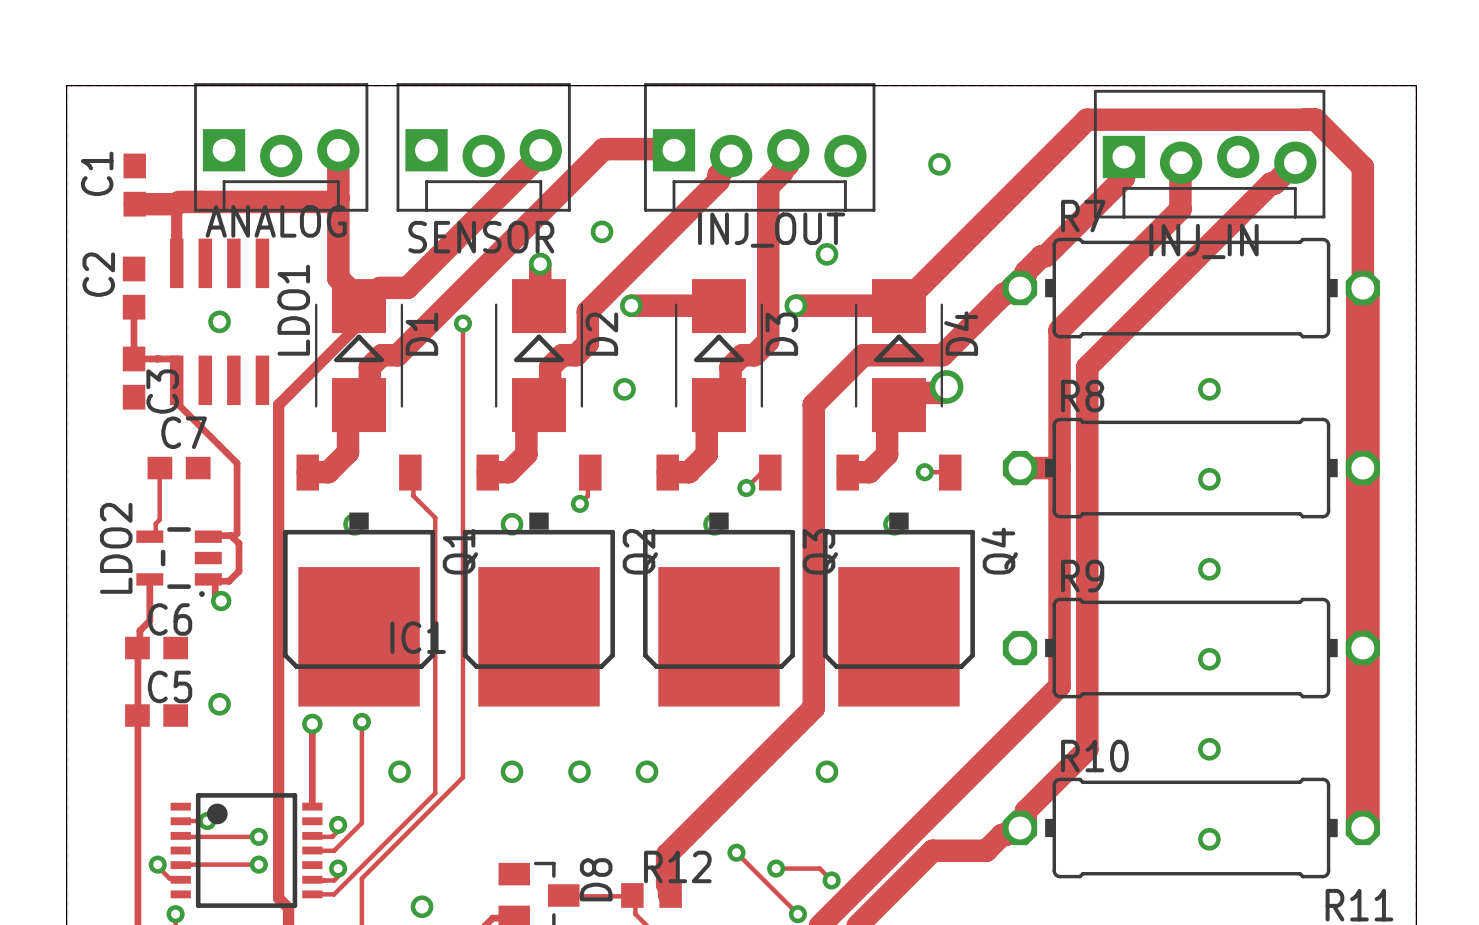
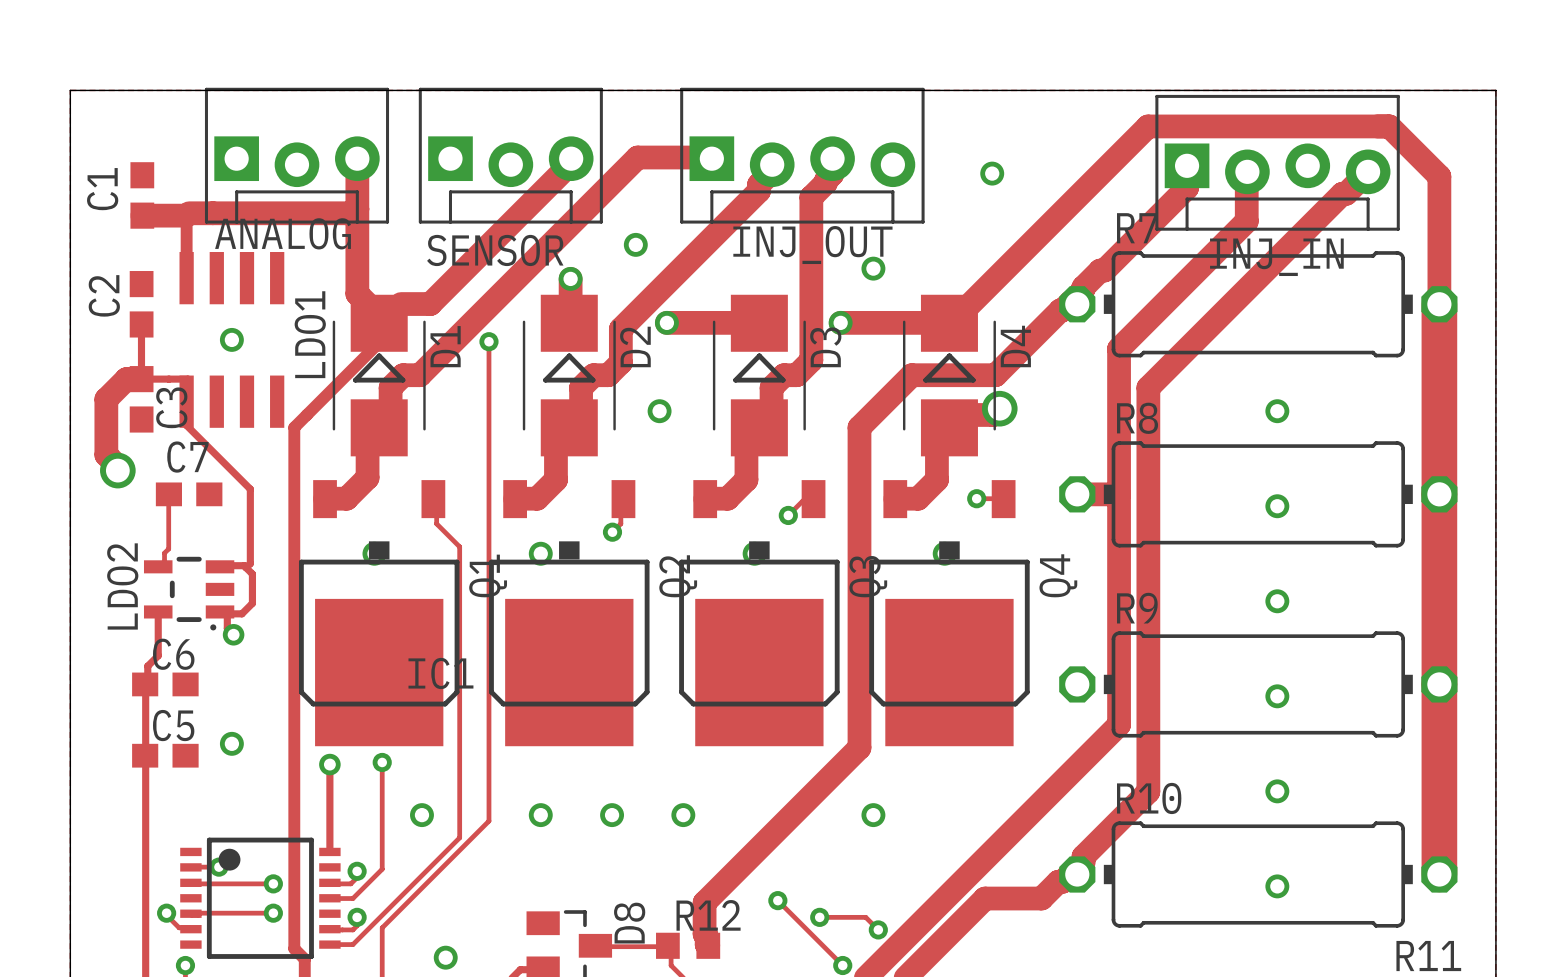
track: none -> (141, 379) (126, 379) (106, 399) (106, 454) (117, 466) (117, 470)
via: none -> (117, 470)

